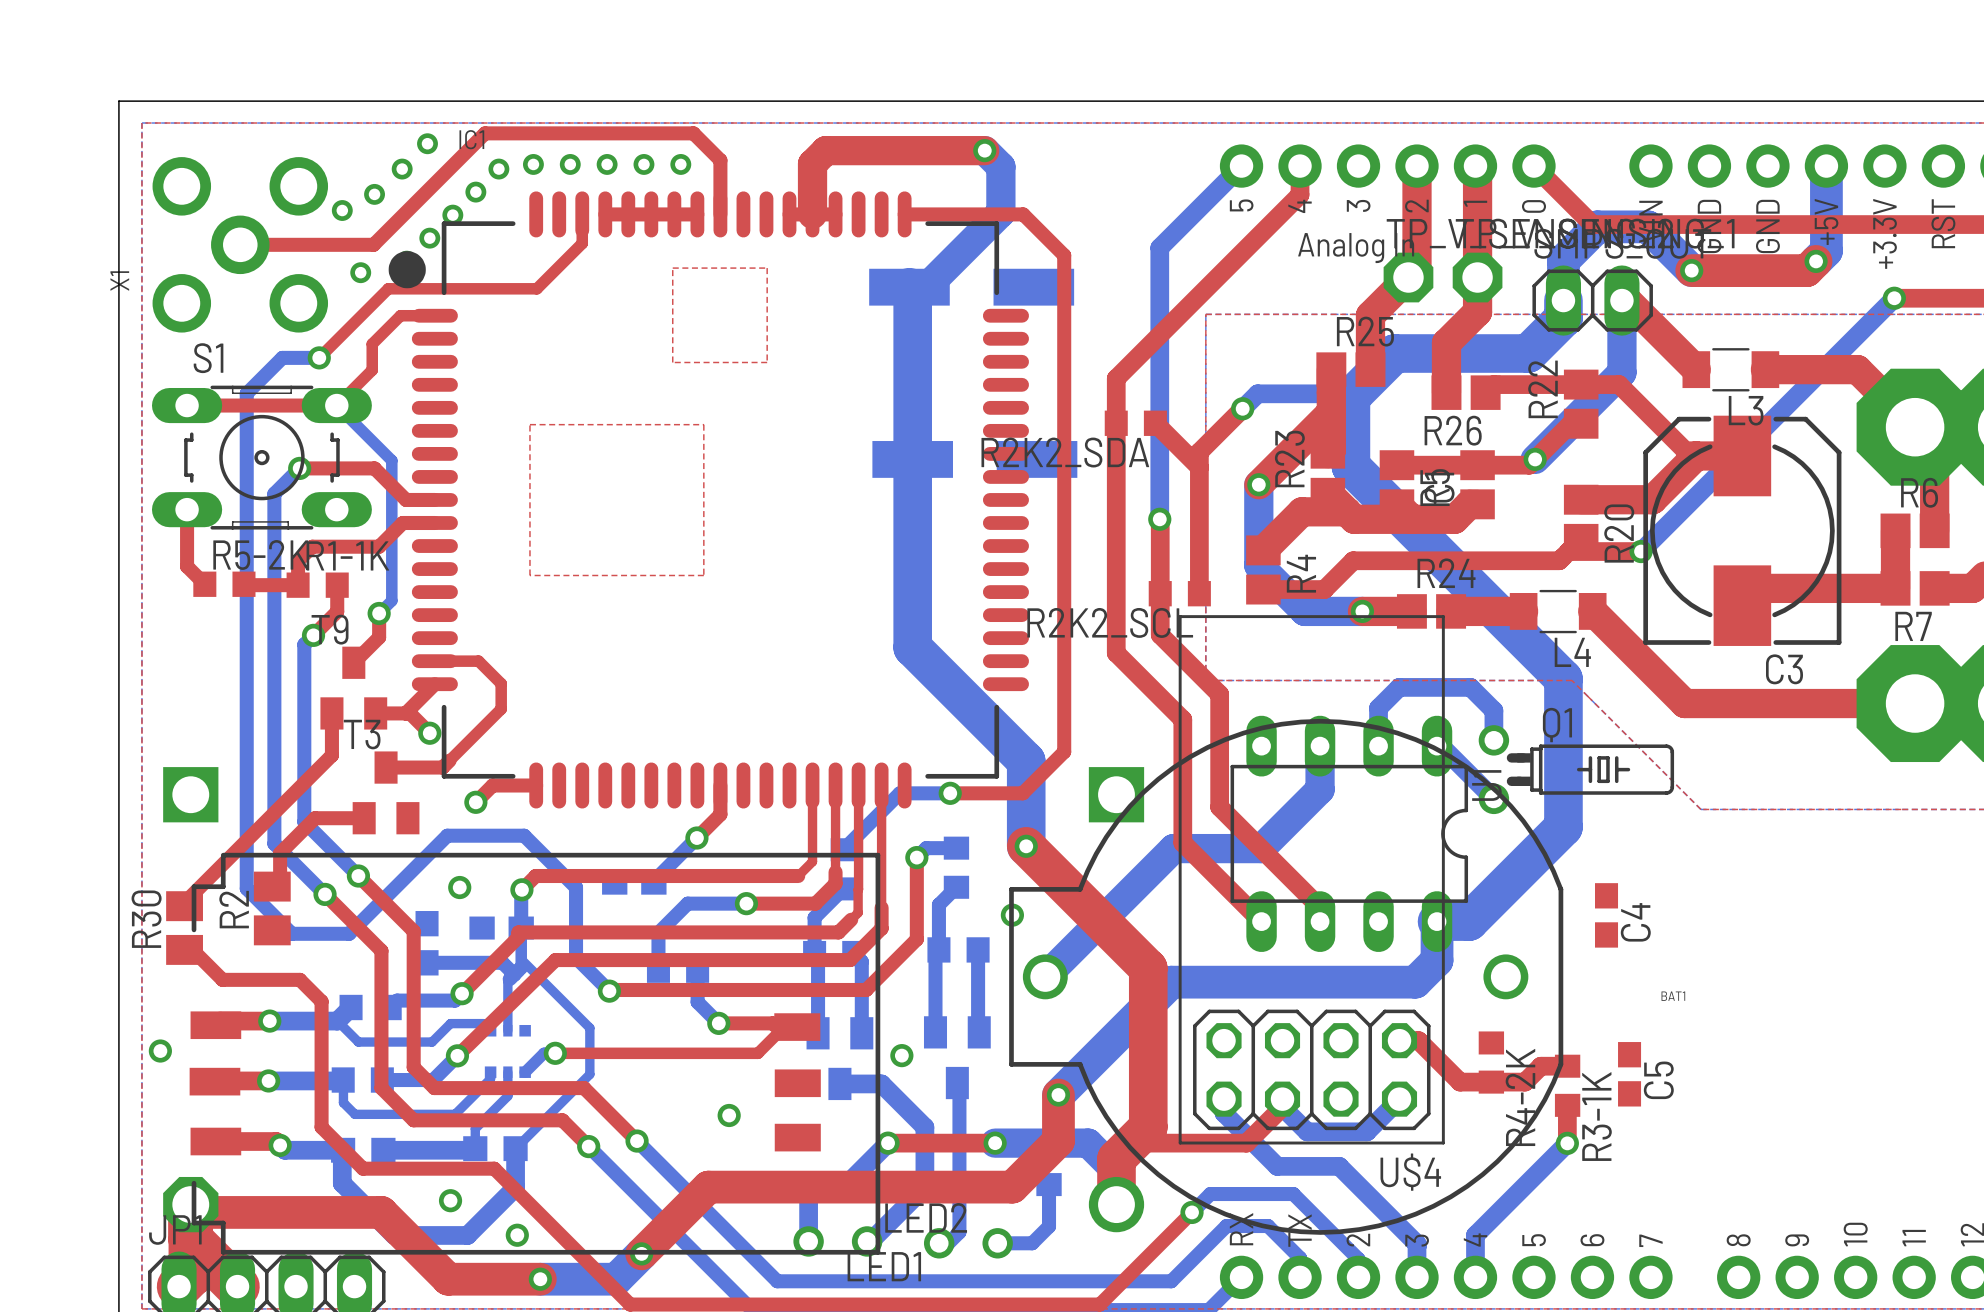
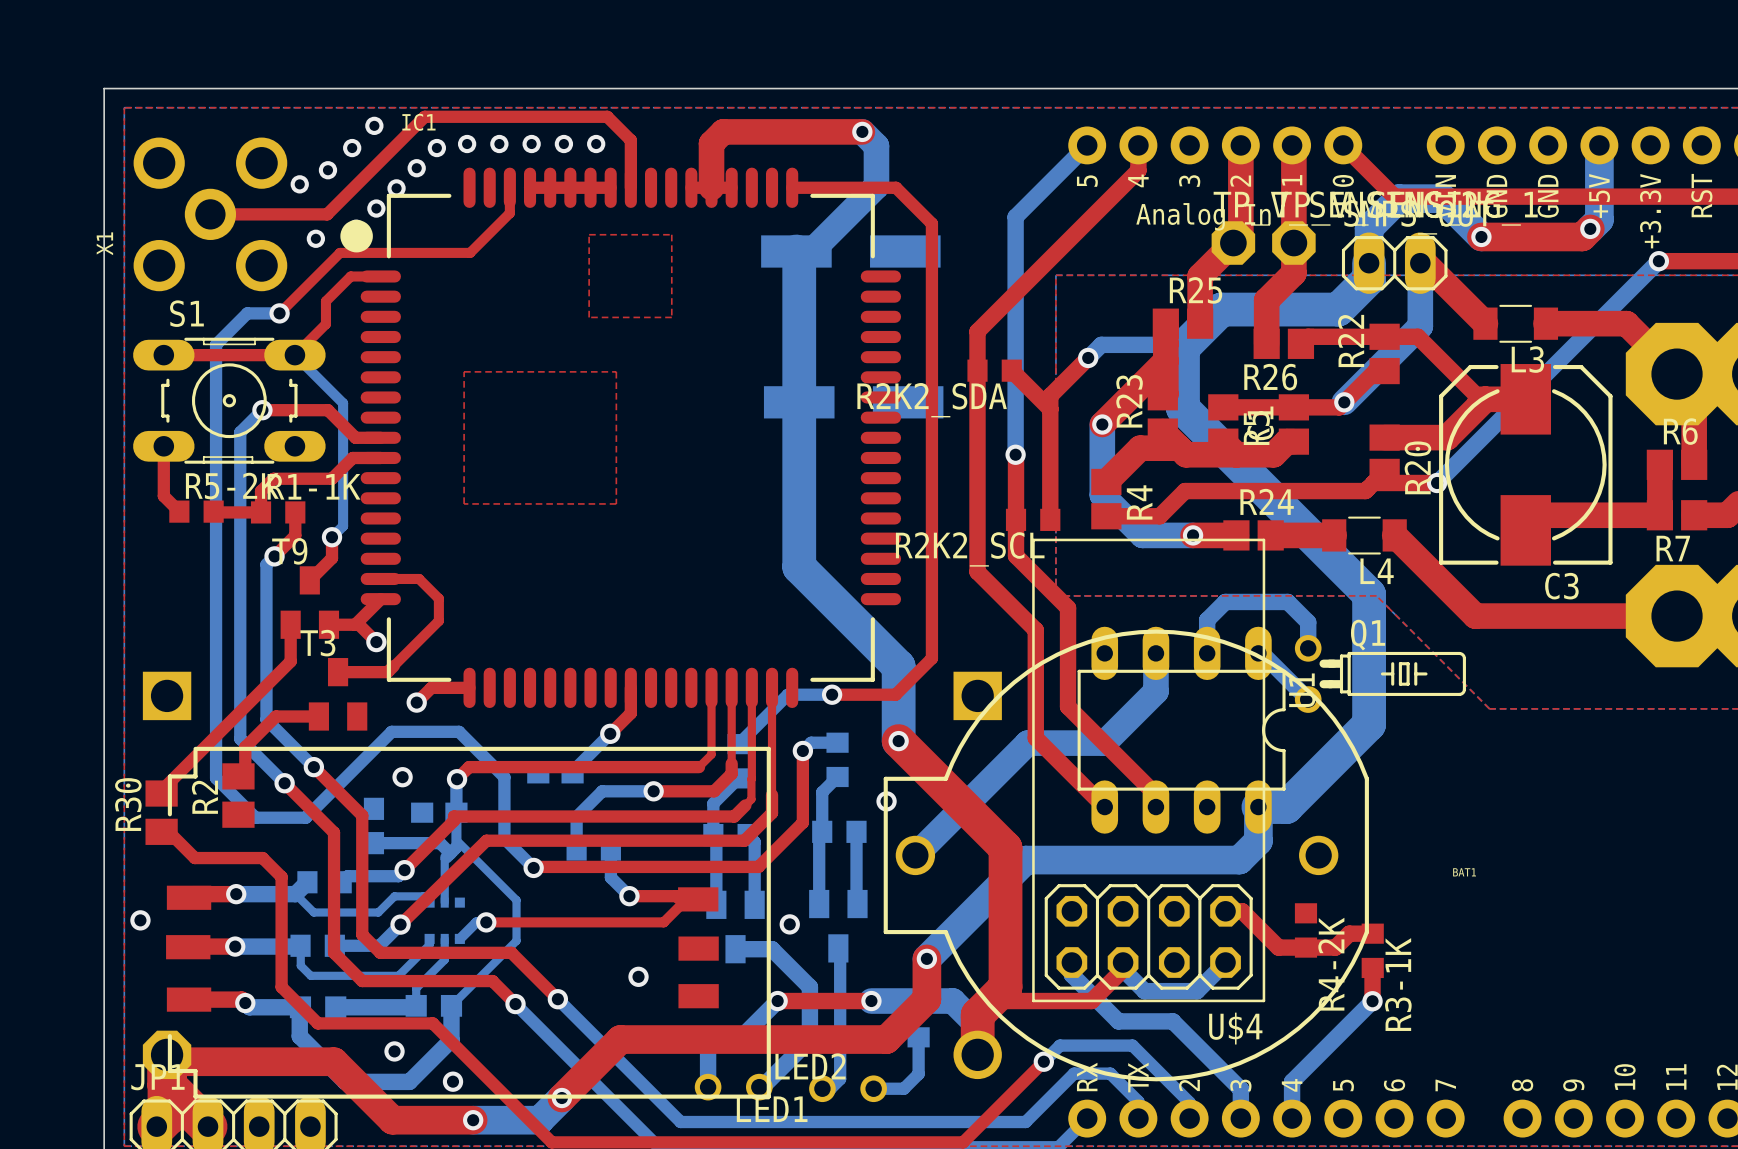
C4: (1606, 915) -> none
C5: (1629, 1074) -> none

